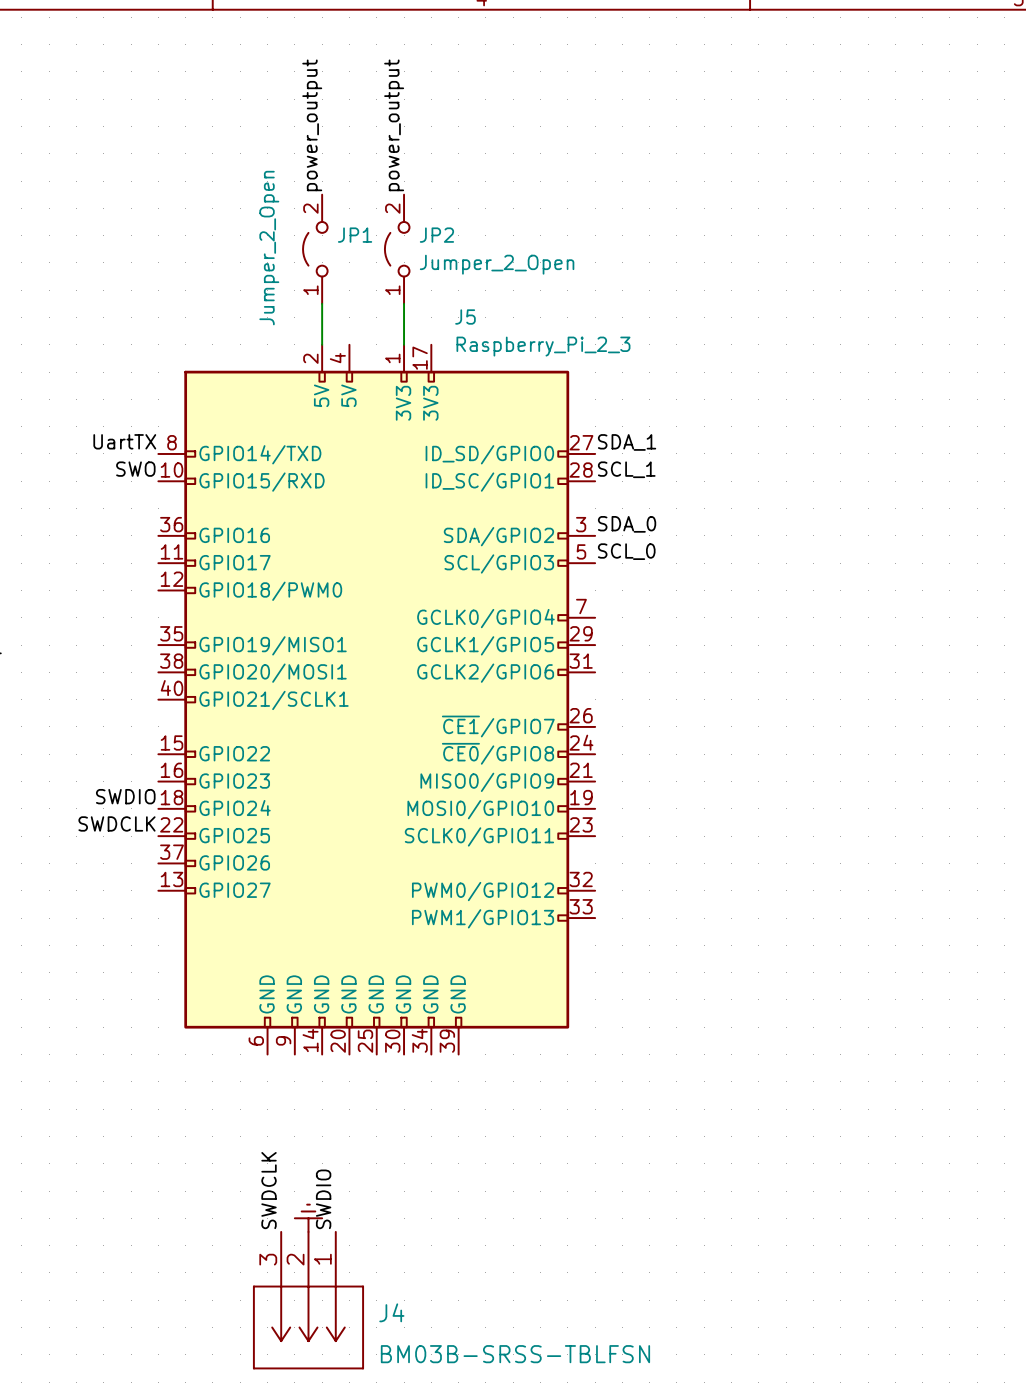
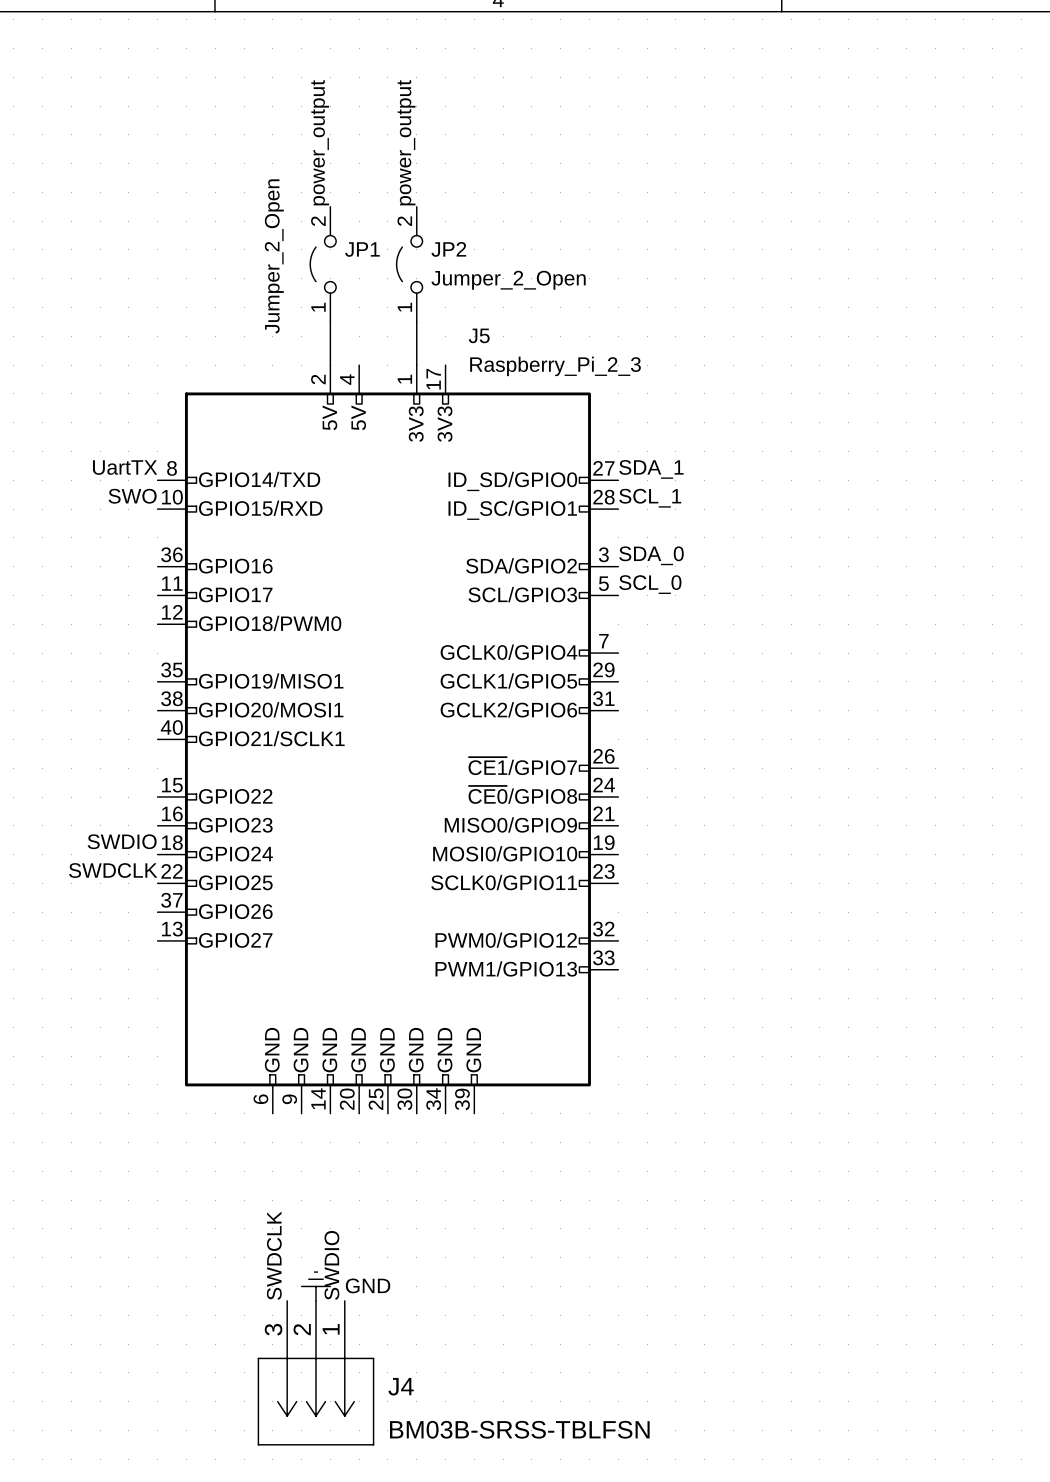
power symbol text: none -> GND (368, 1285)

